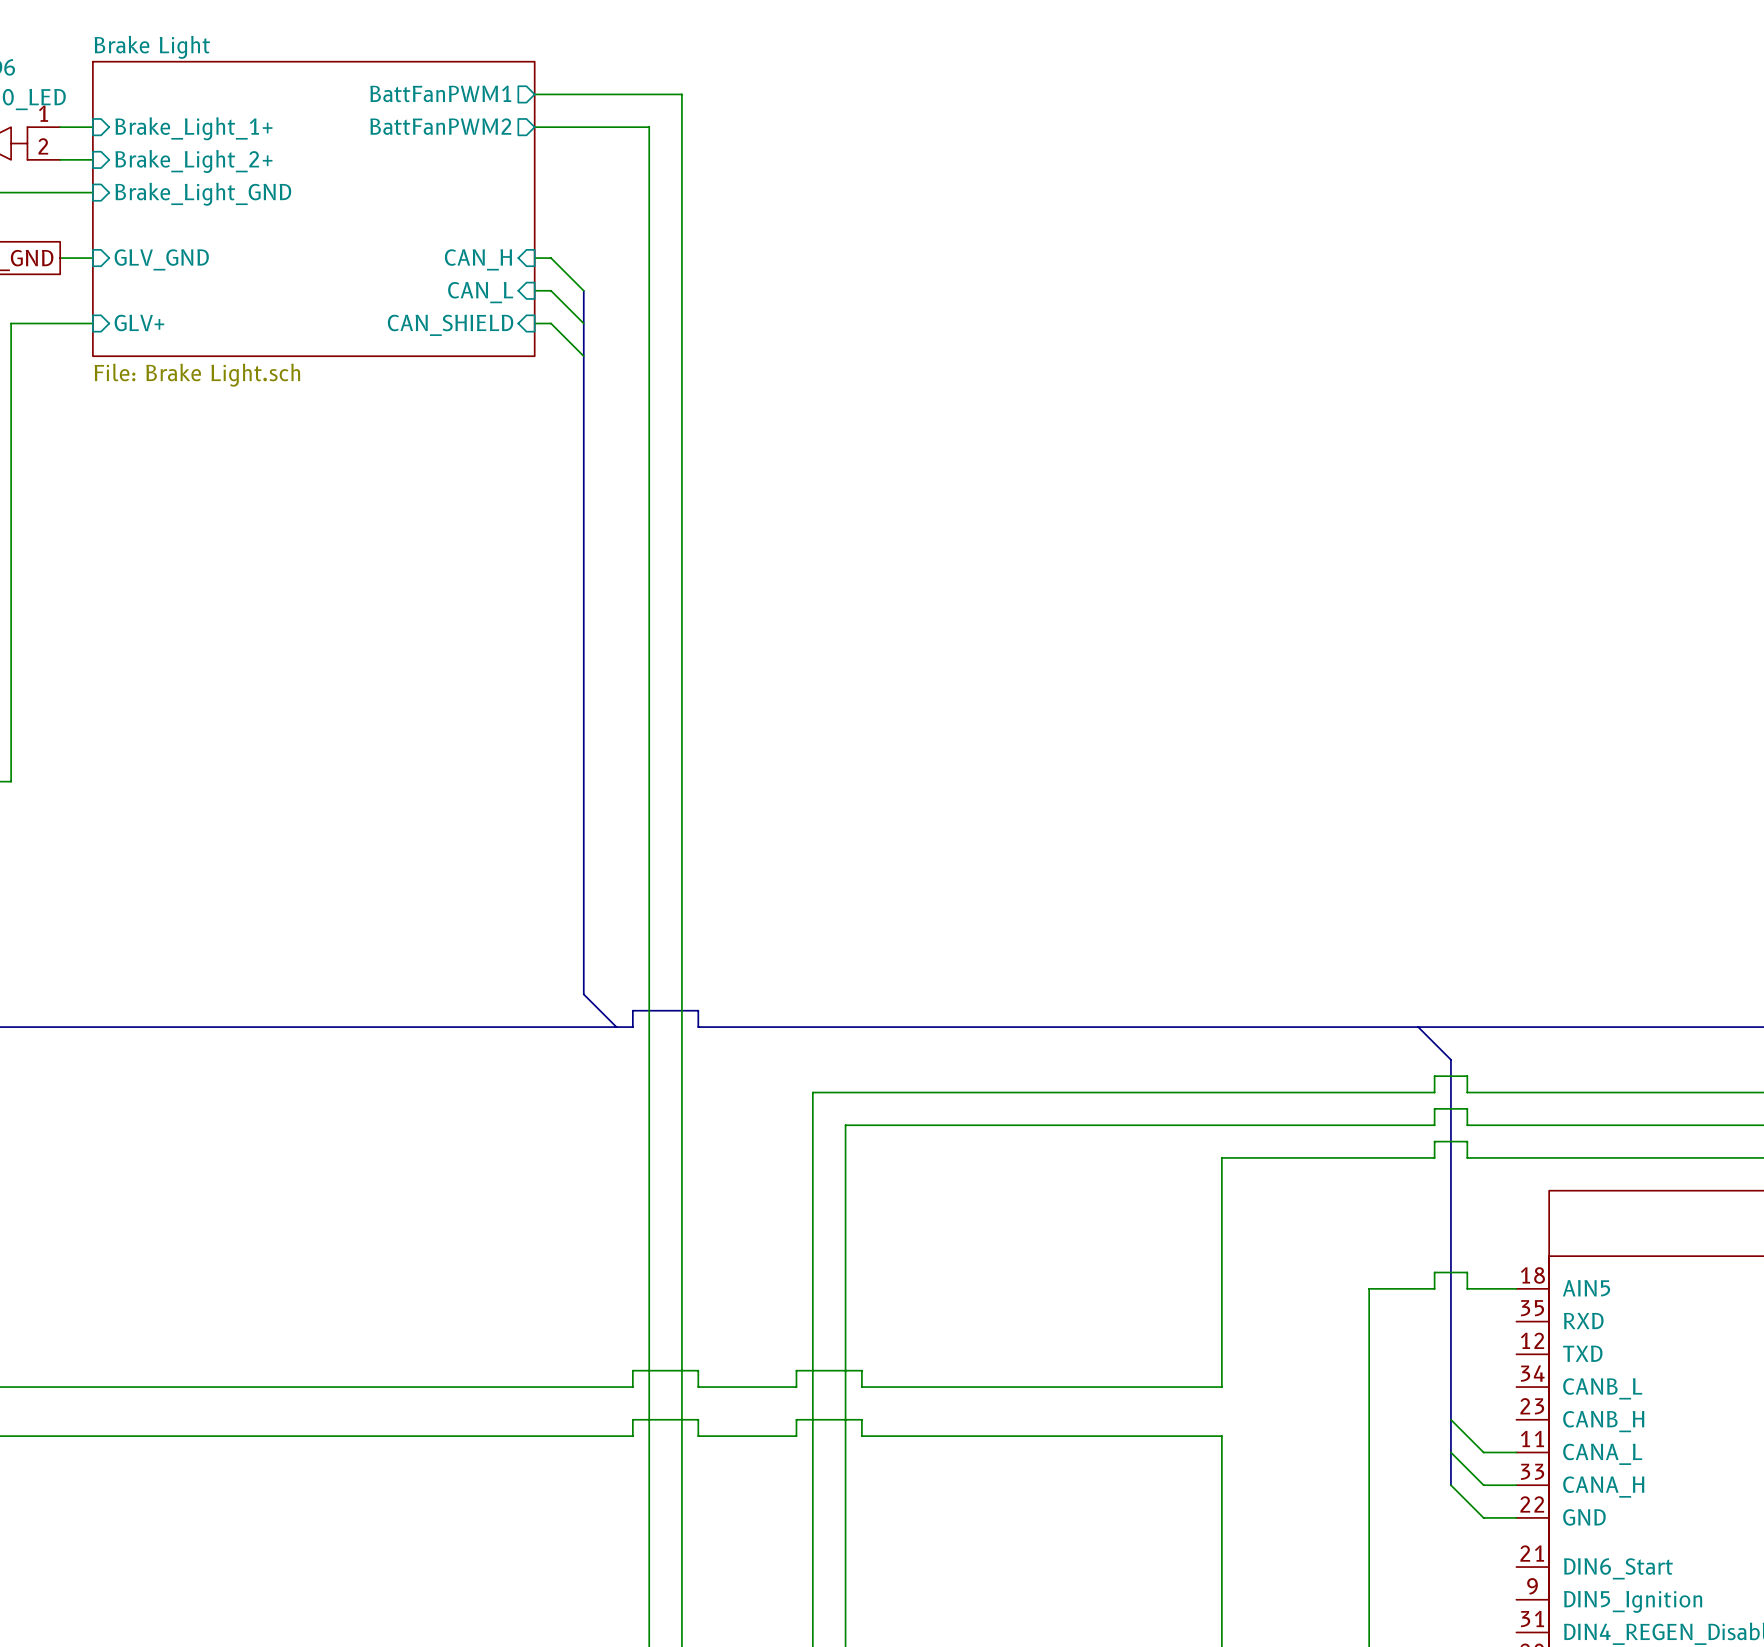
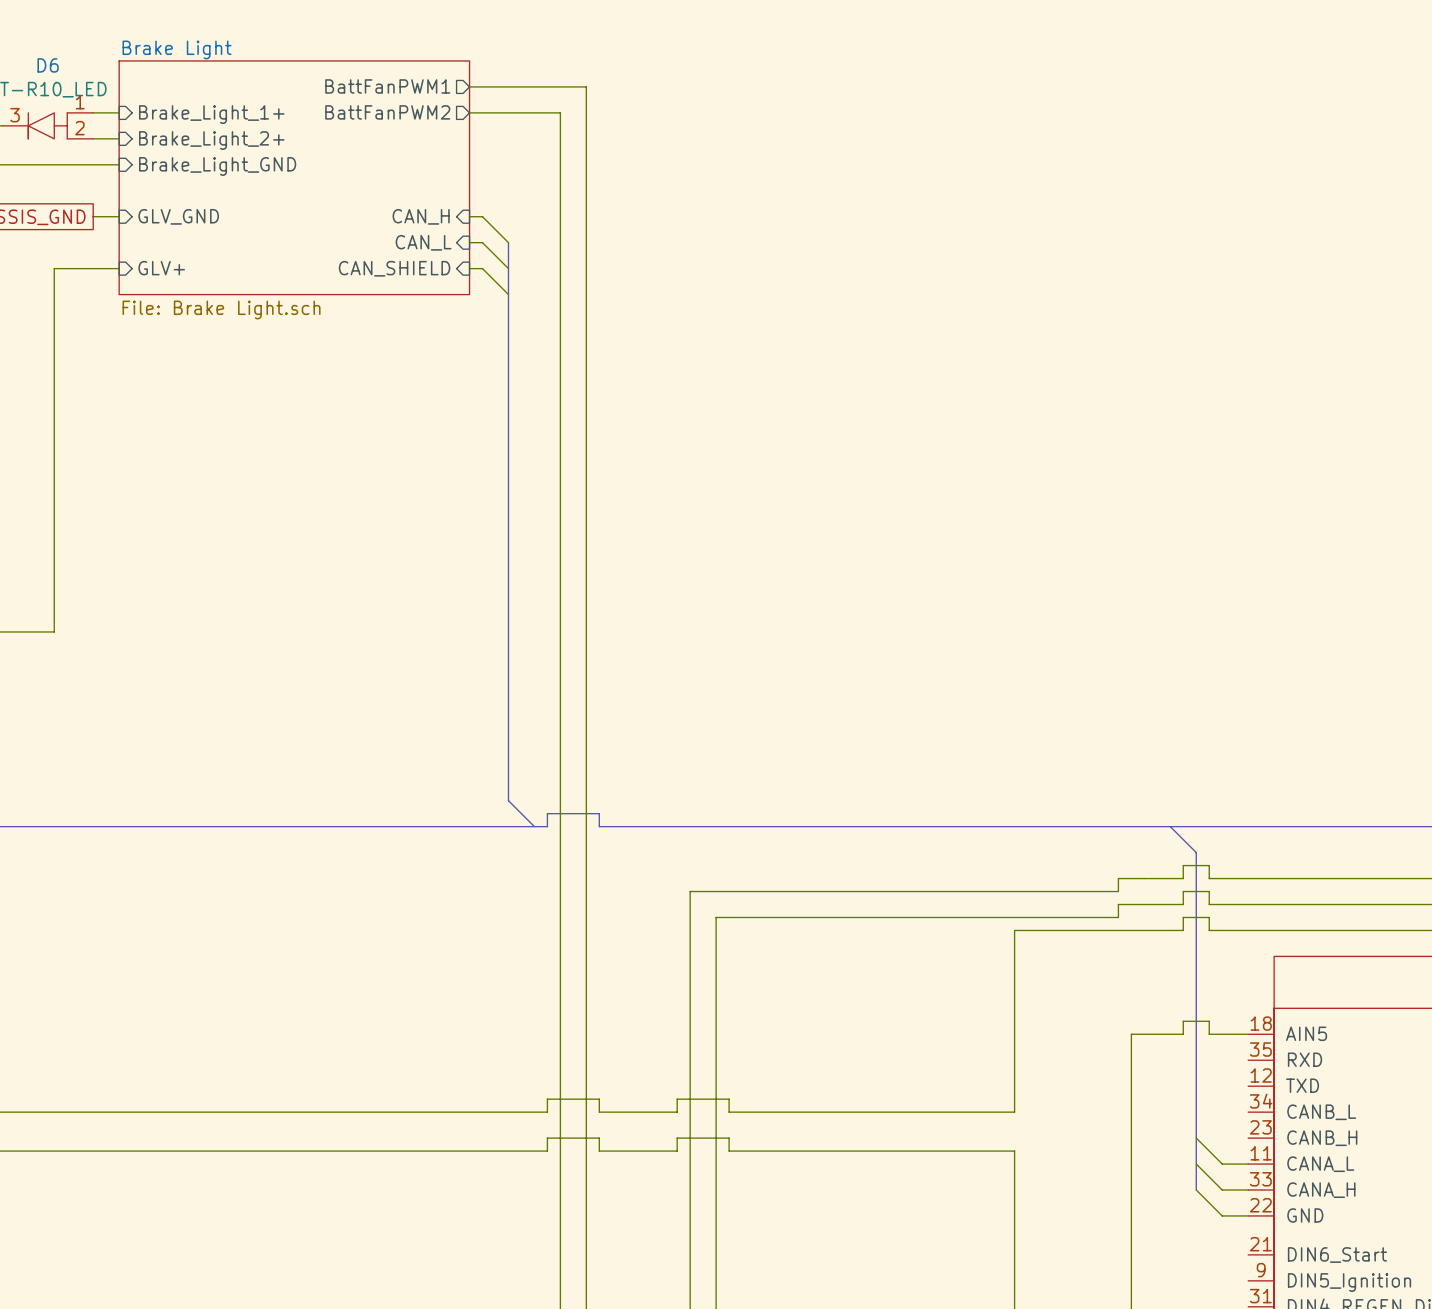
wire: (1352, 1092) (812, 1092) (812, 1108) -> (1118, 878) (1118, 891) (690, 891)
wire: (1352, 1125) (845, 1125) (845, 1141) -> (1118, 904) (1118, 917) (716, 917)

